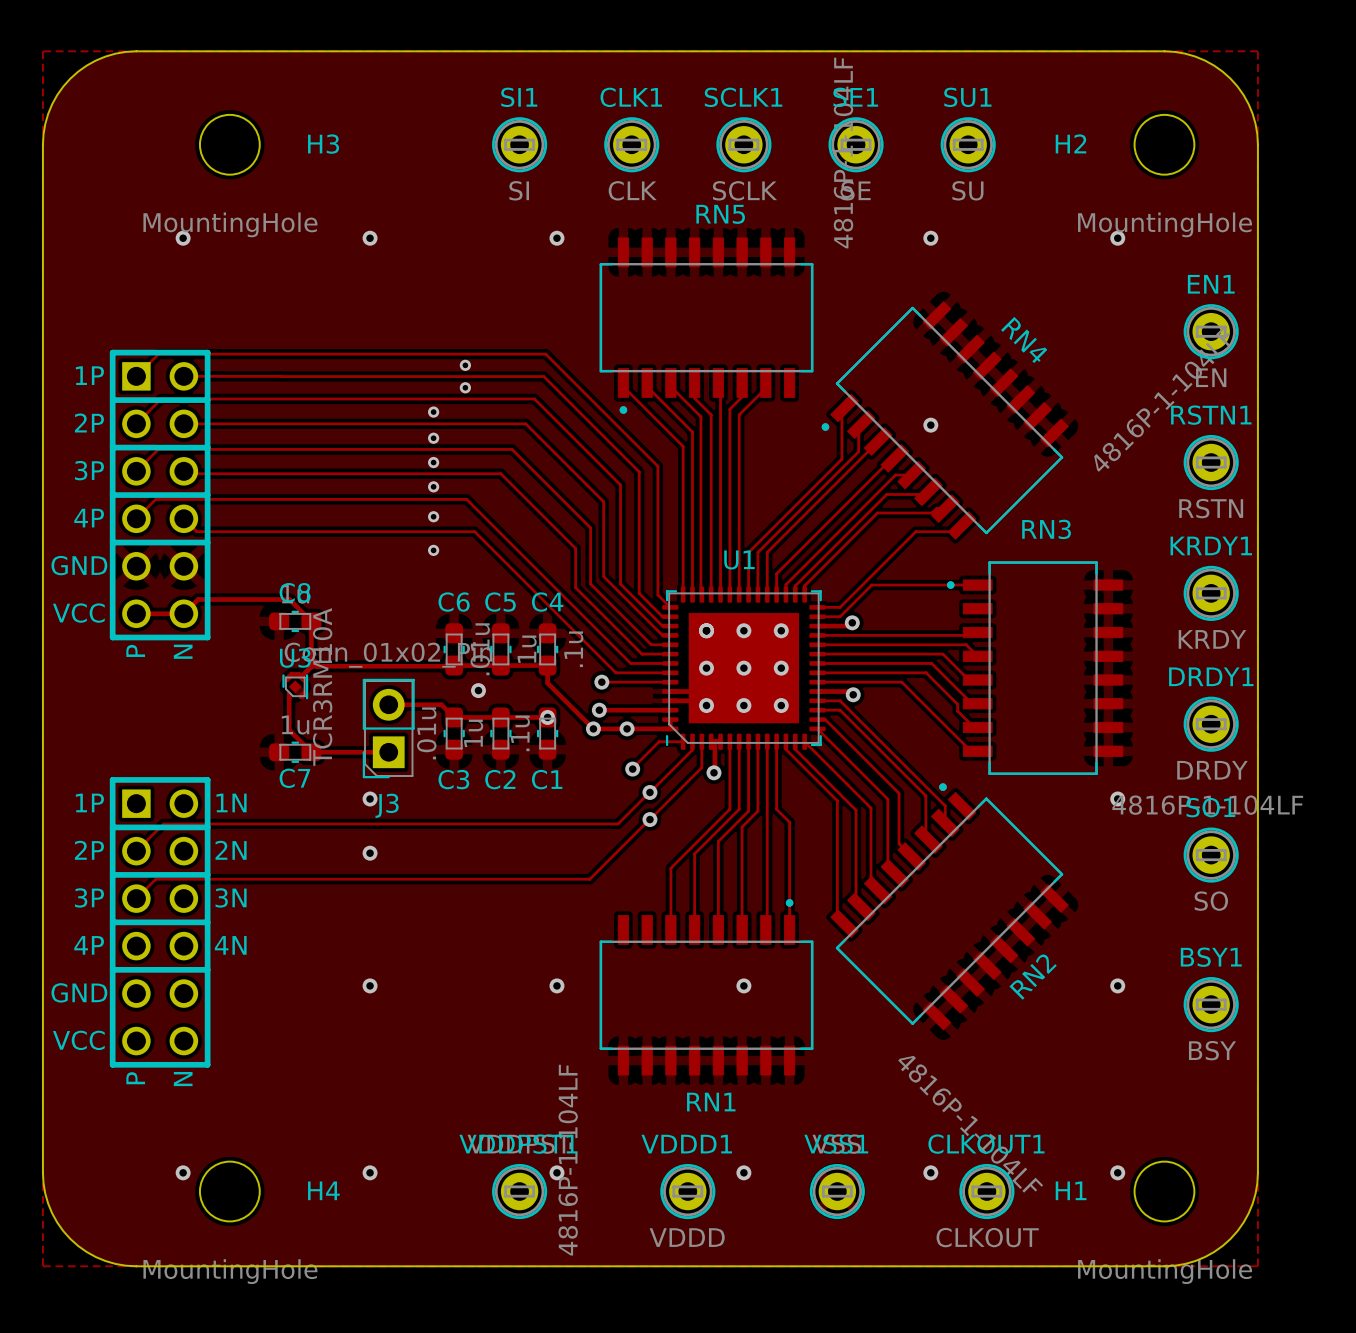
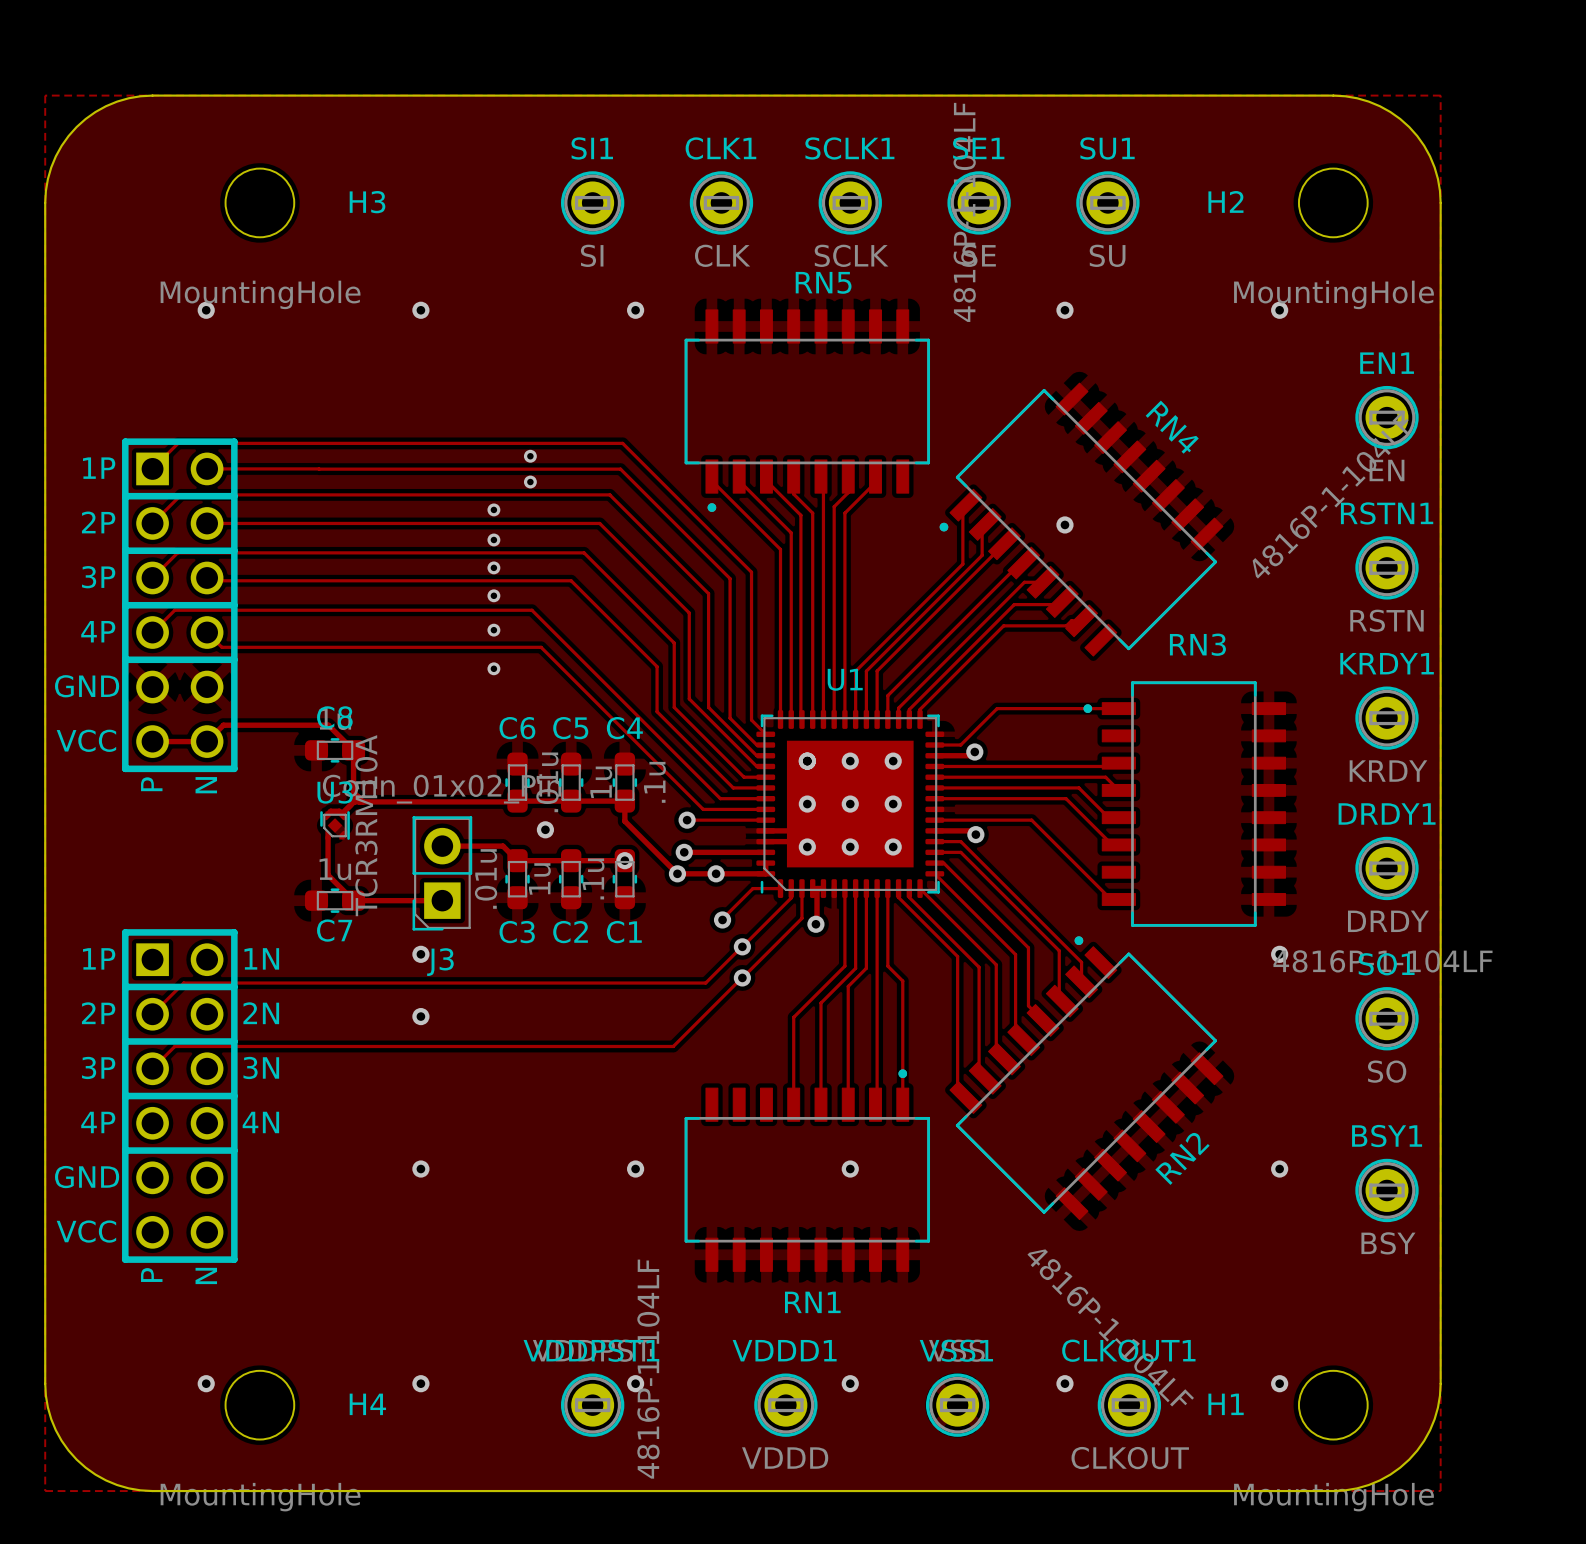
track: (955, 531) (915, 531) (840, 607) (817, 607) -> none
track: (817, 672) (926, 672) (957, 704) (957, 711) (974, 727) -> none
track: (729, 741) (729, 809) (670, 868) (670, 929) -> none

